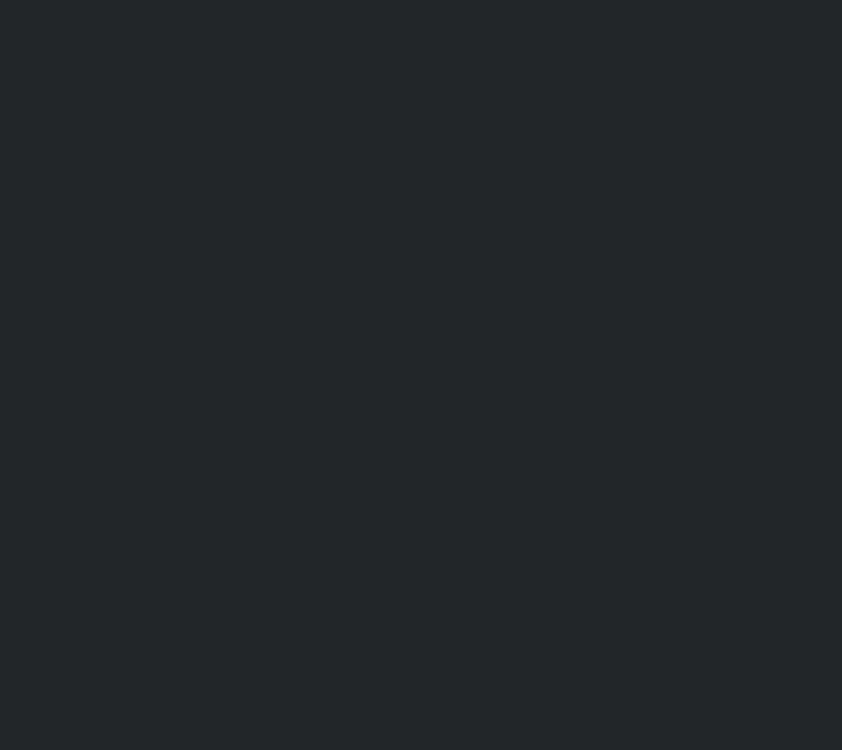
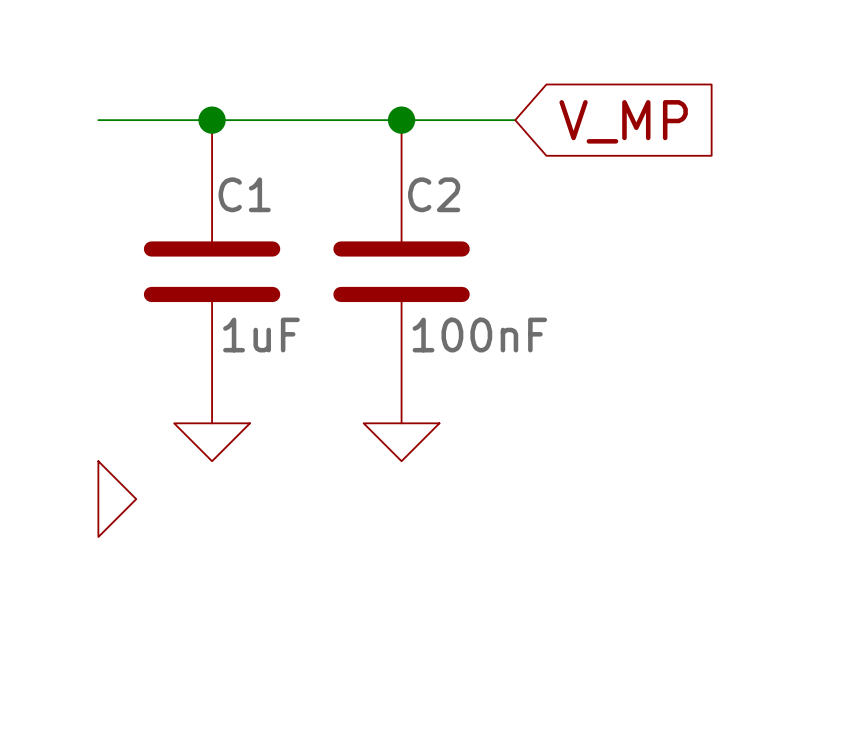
wire: none -> (98, 120) (515, 120)
junction: none -> (212, 120)
junction: none -> (401, 120)
global label: none -> V_MP (623, 121)
C1: none -> 1uF (212, 271)
C2: none -> 100nF (401, 271)
power symbol: none -> (212, 442)
power symbol: none -> (401, 442)
power symbol: none -> (117, 499)

